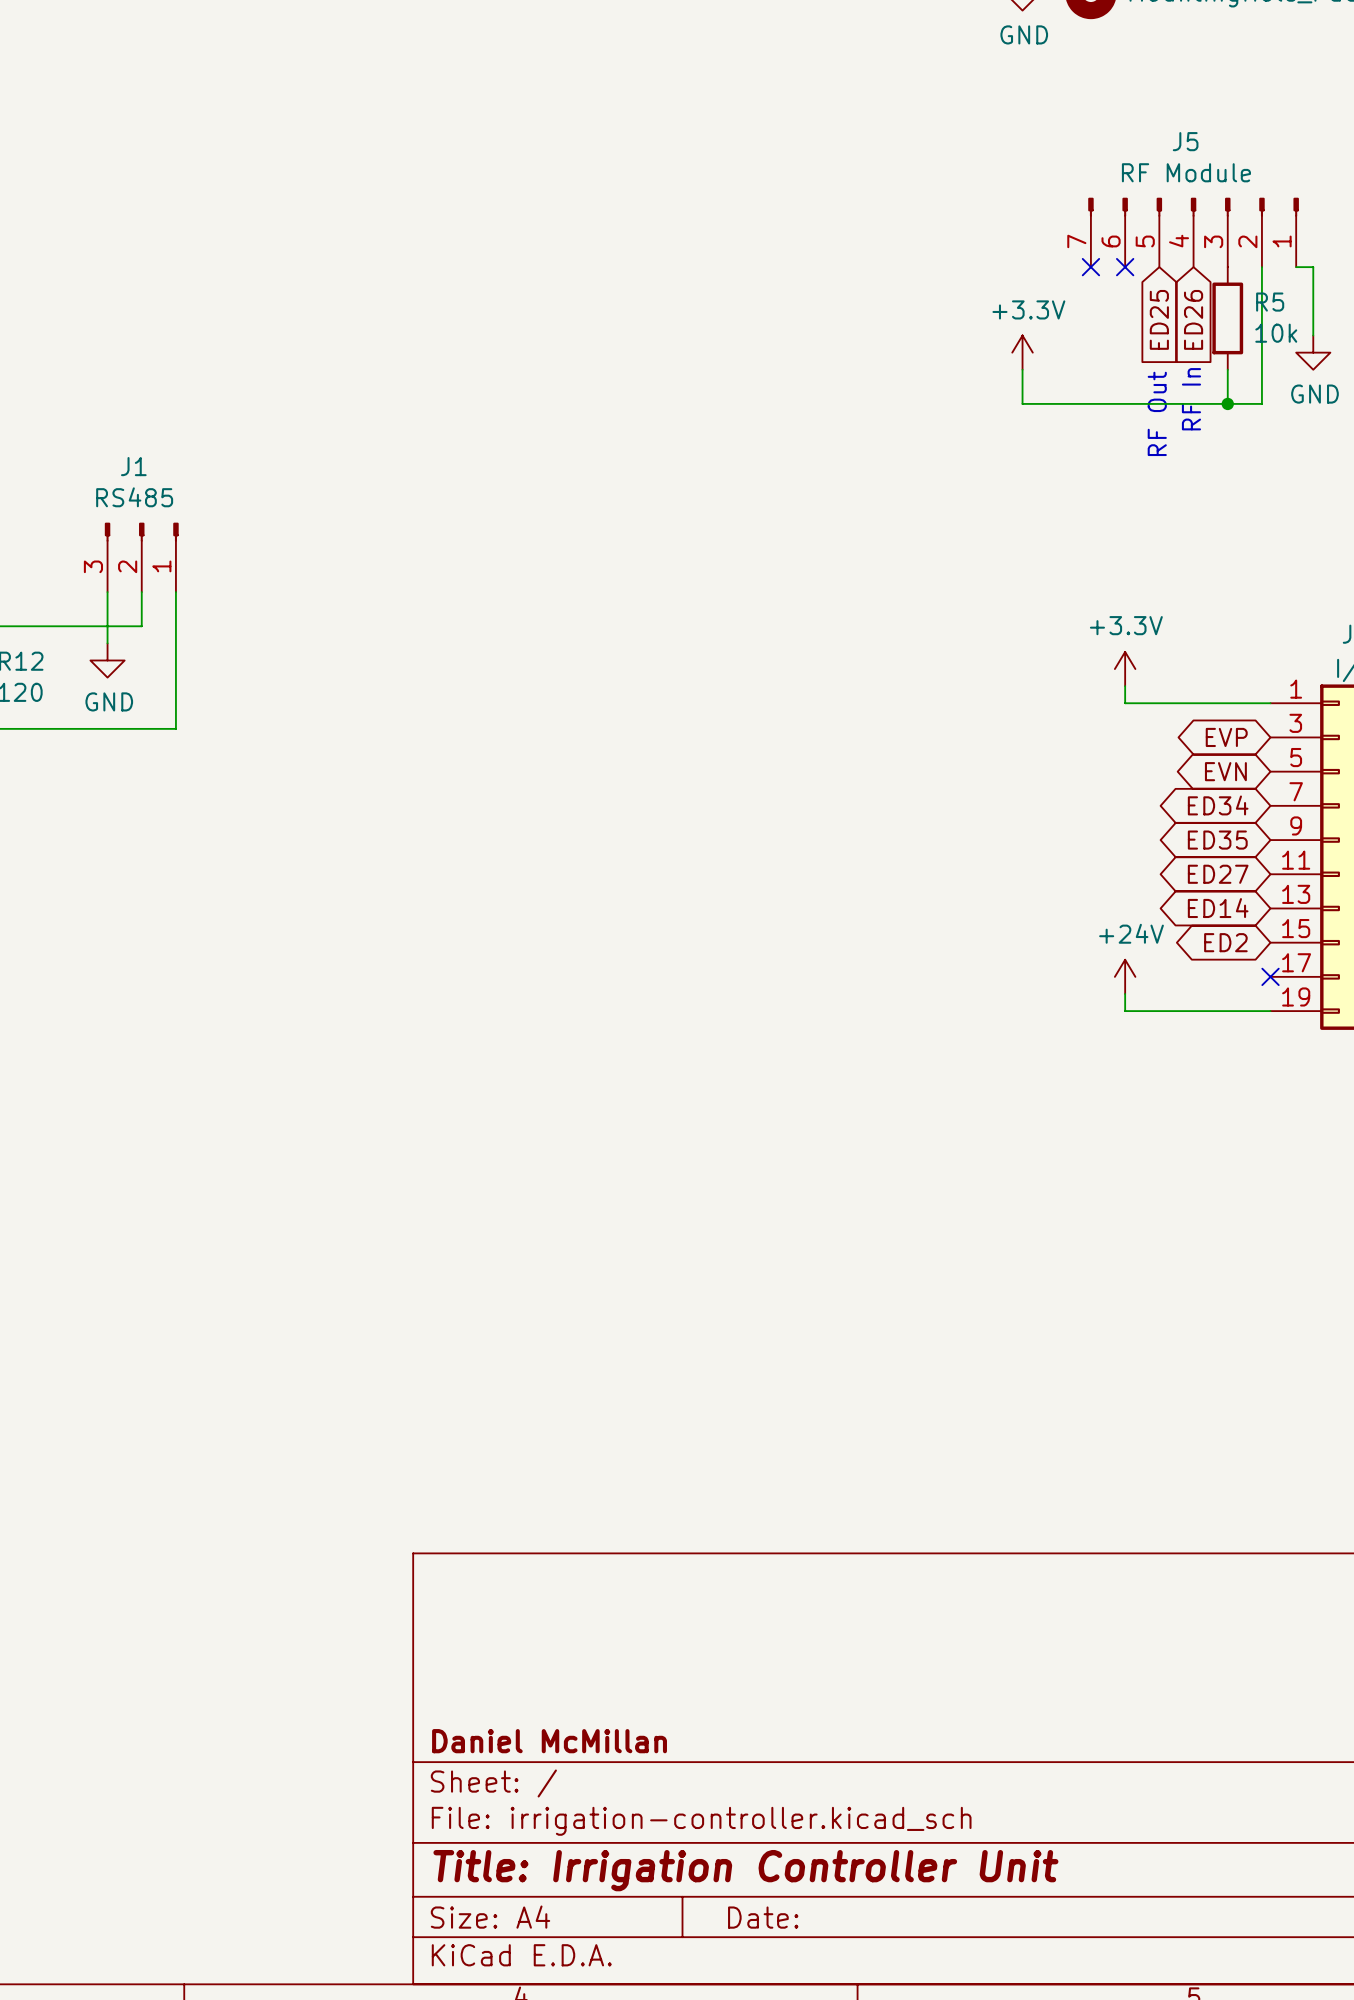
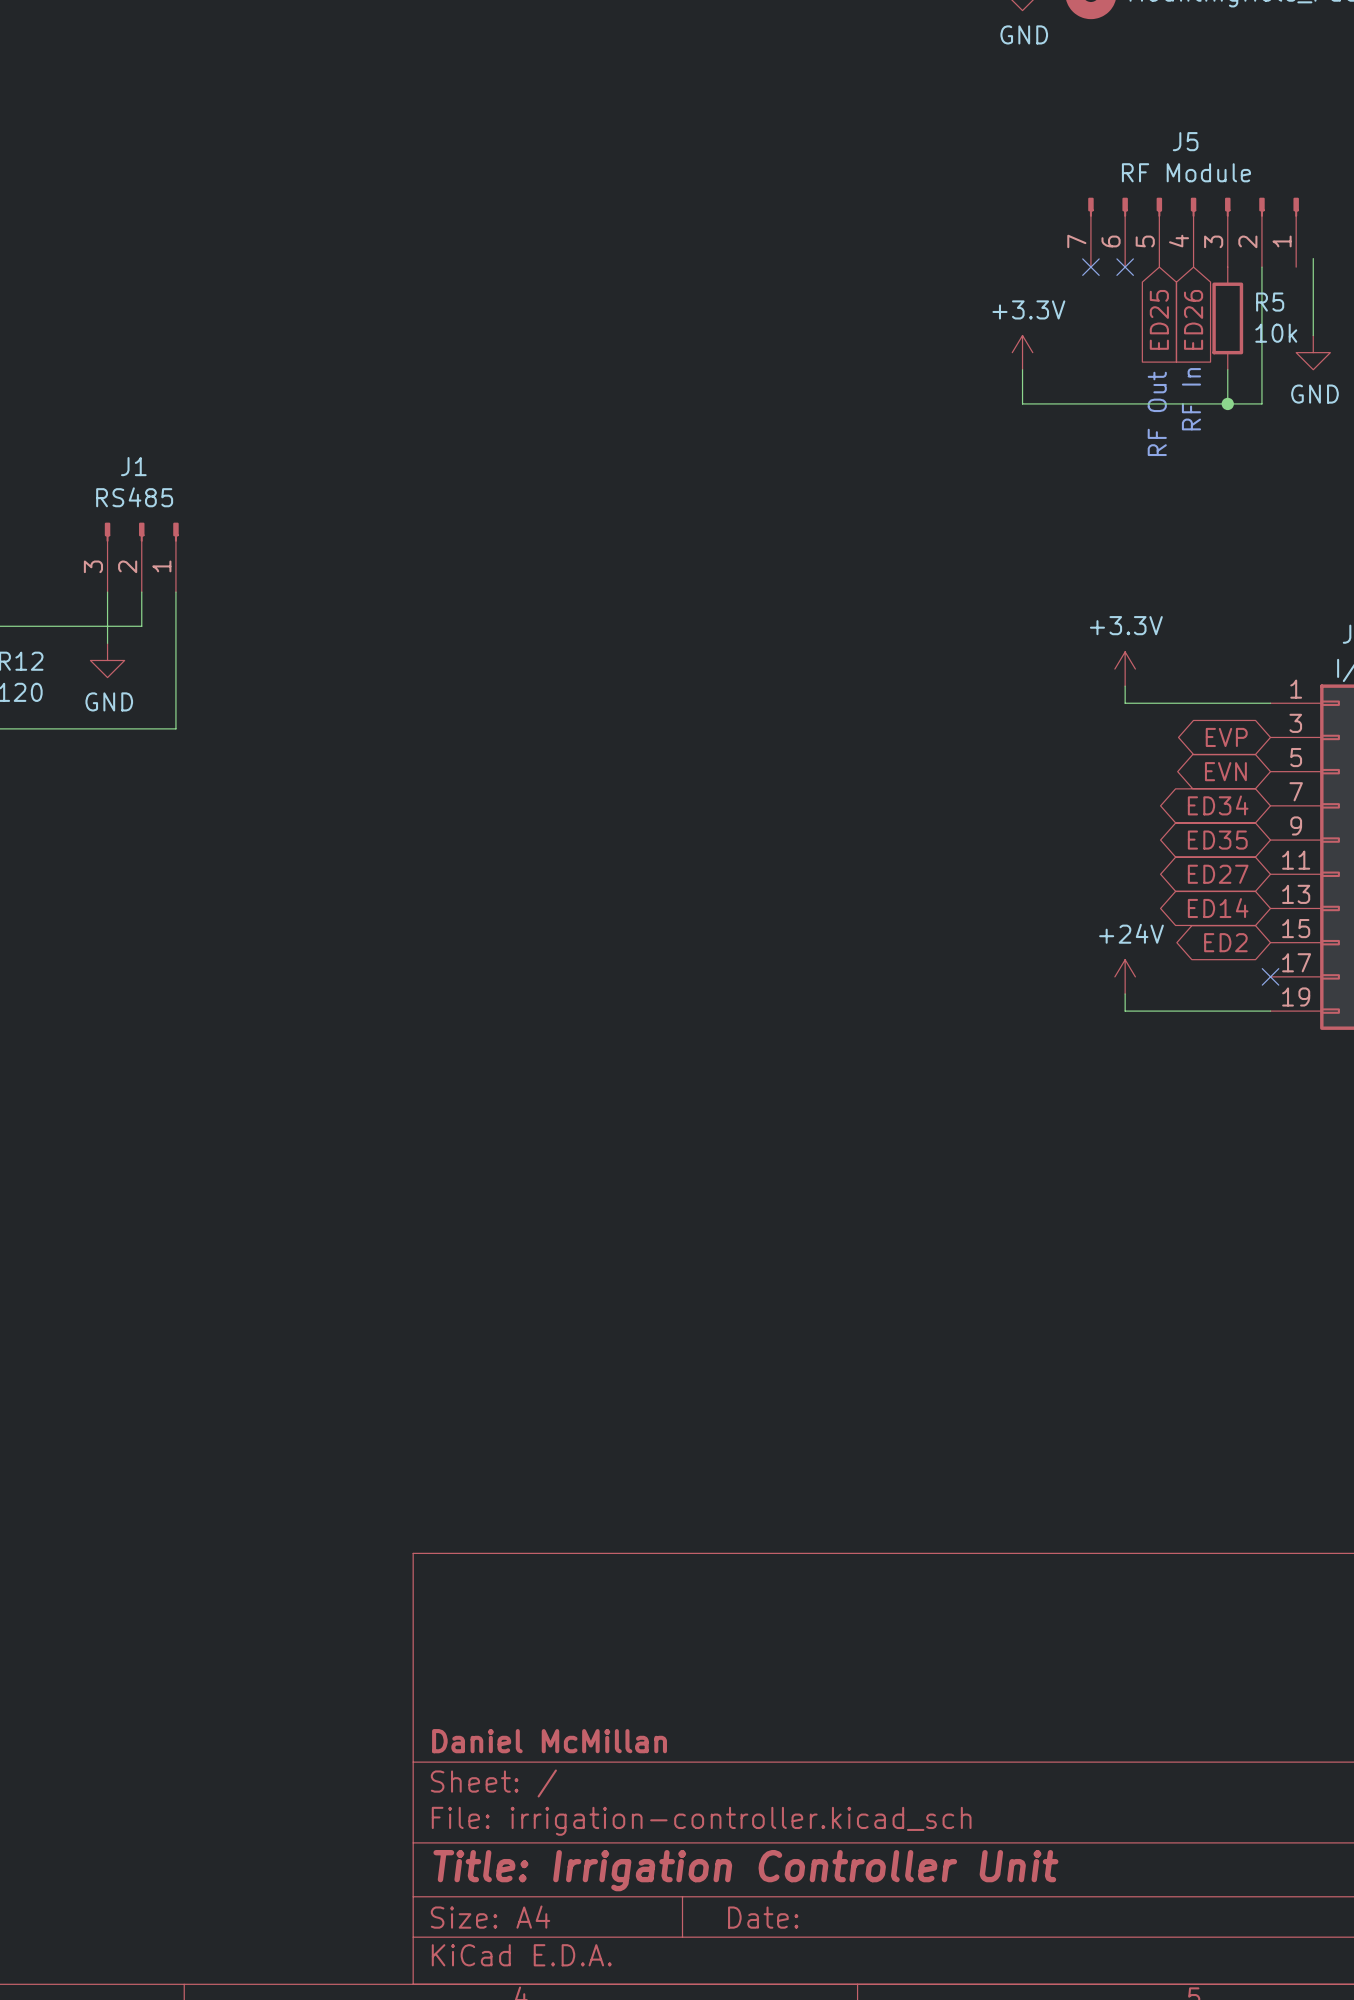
wire: (1296, 267) (1313, 267) -> (1313, 258) (1313, 267)

